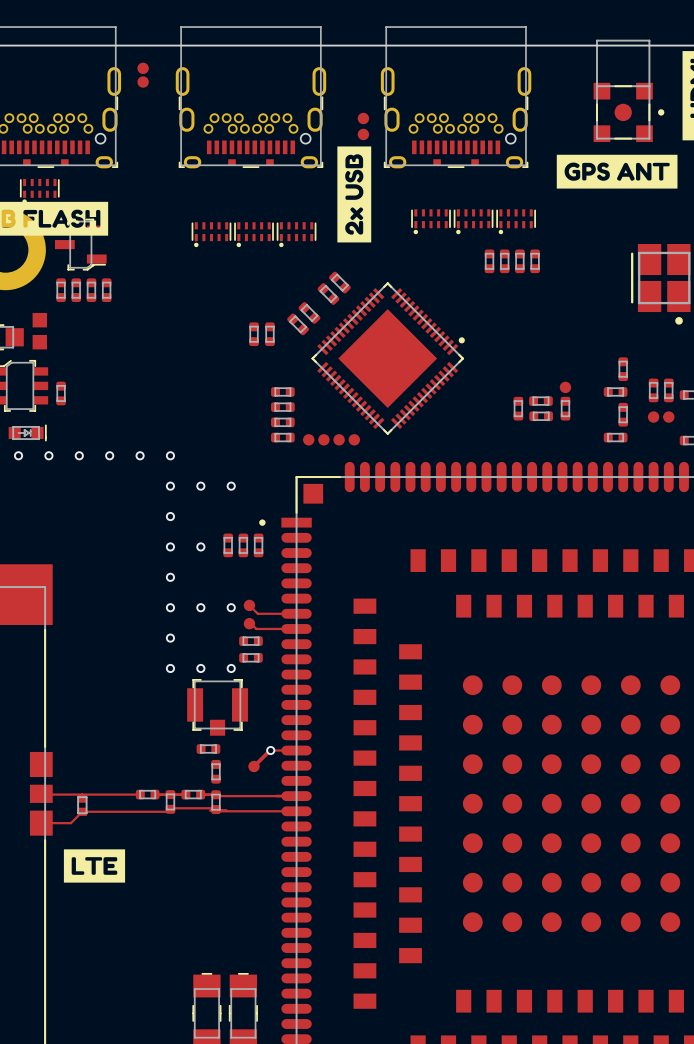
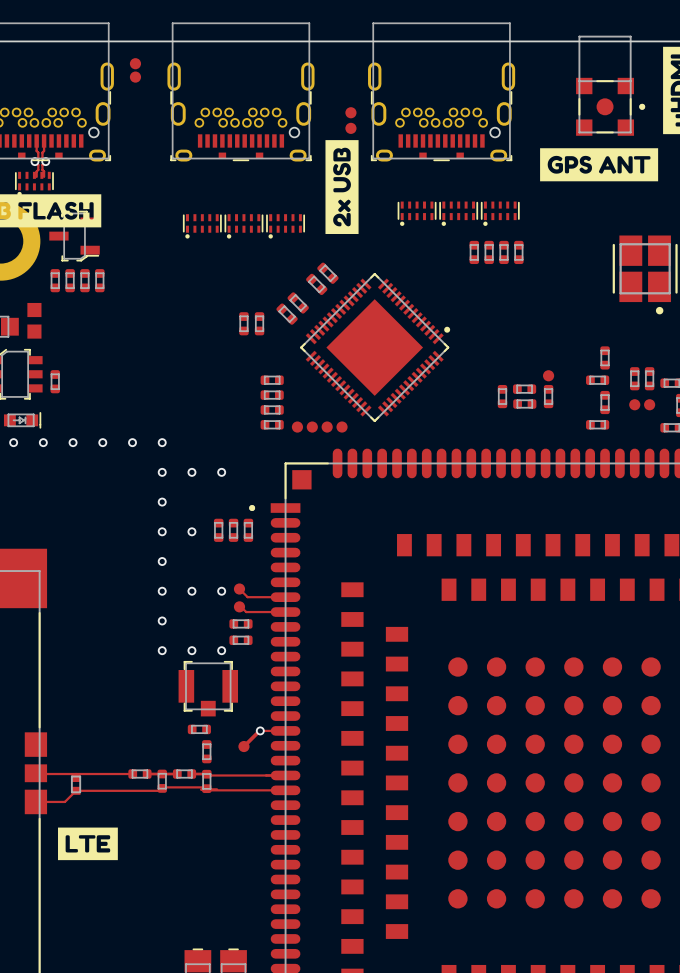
track: none -> (36, 140) (38, 158) (34, 161) (38, 164) (36, 176)
track: none -> (44, 140) (42, 158) (45, 161) (42, 164) (44, 176)
via: none -> (34, 161)
via: none -> (45, 161)

